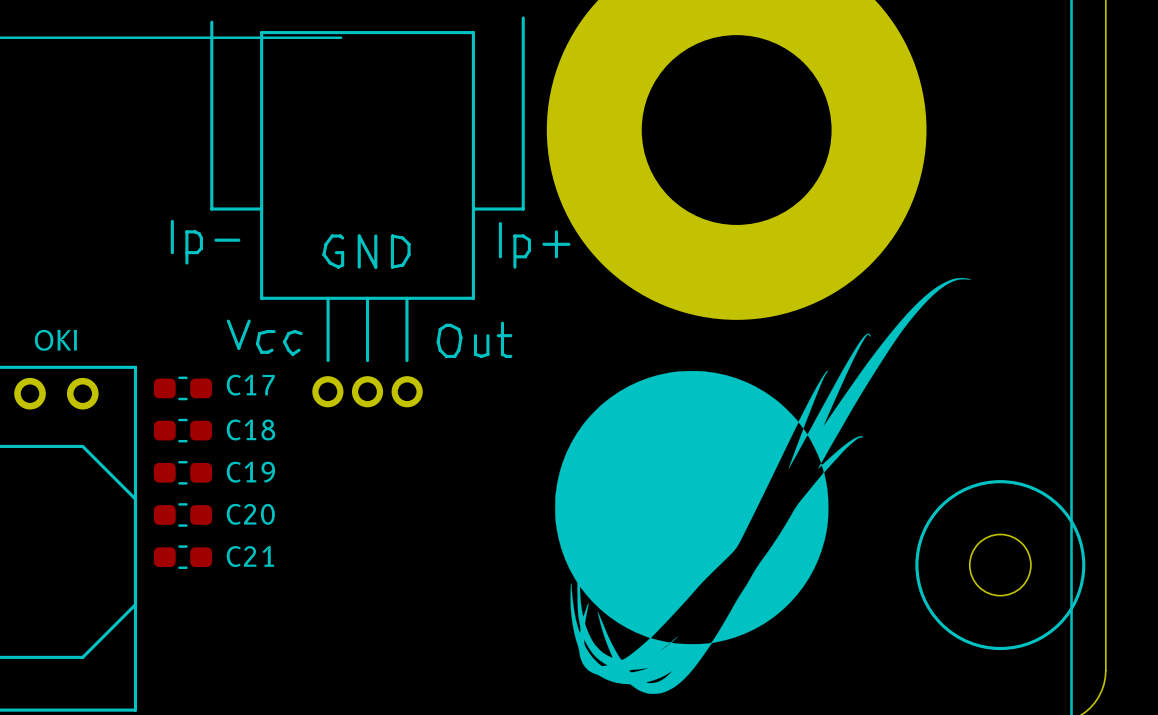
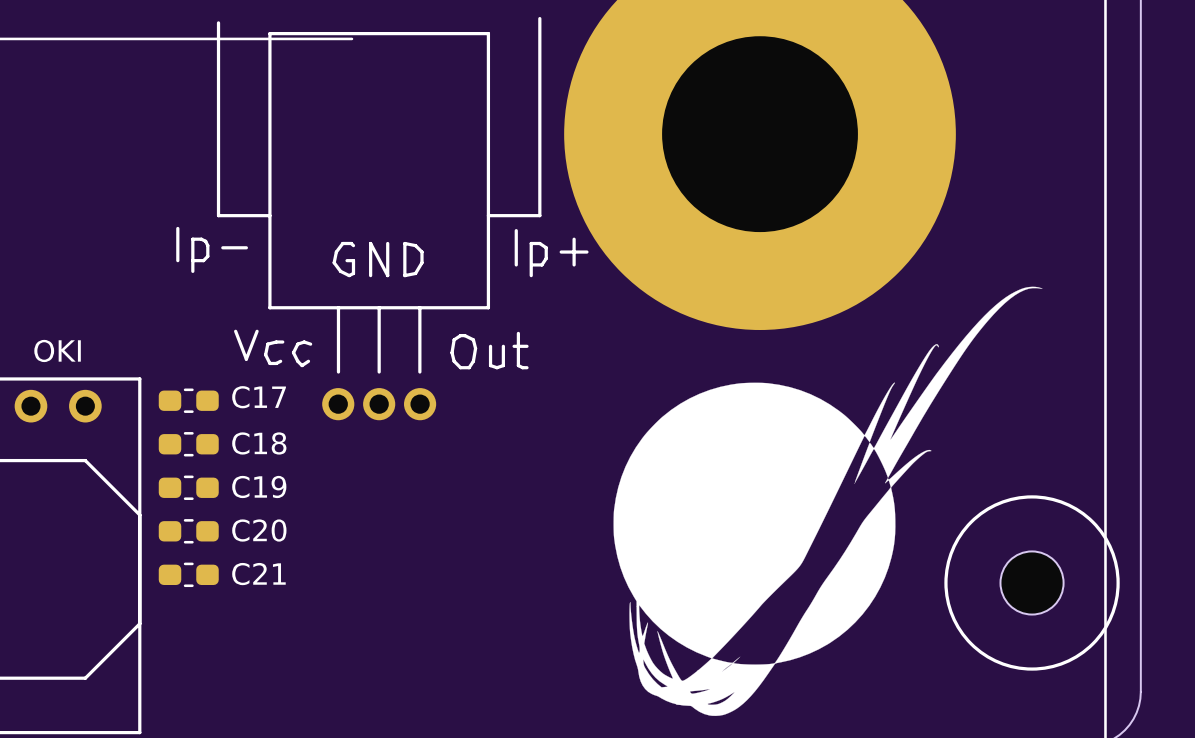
drawing position: (763, 485) -> (828, 501)

